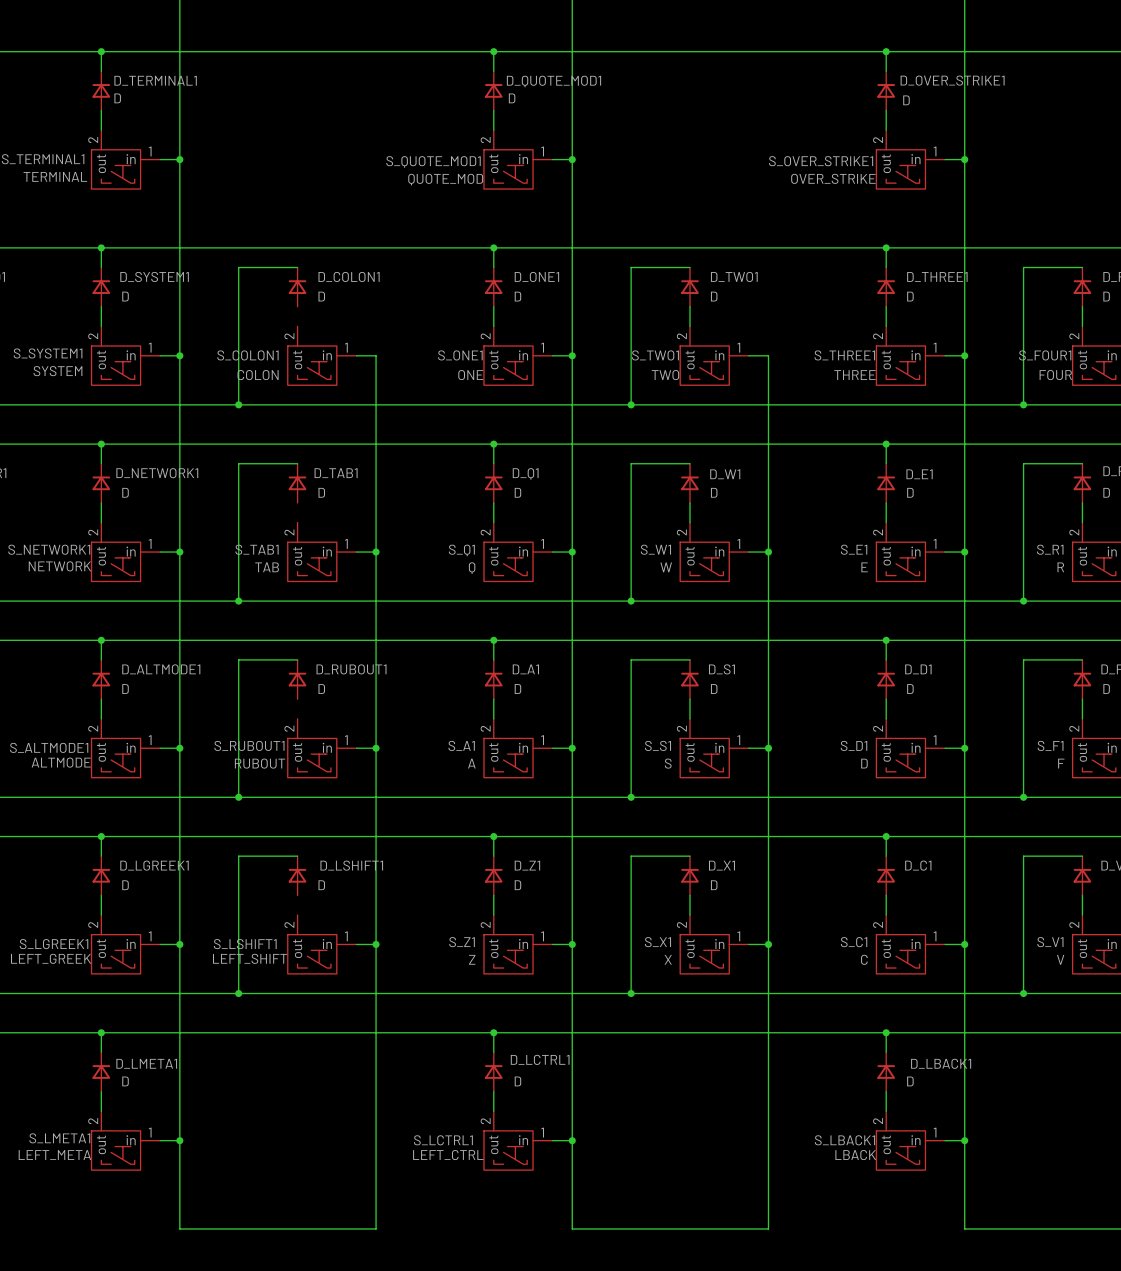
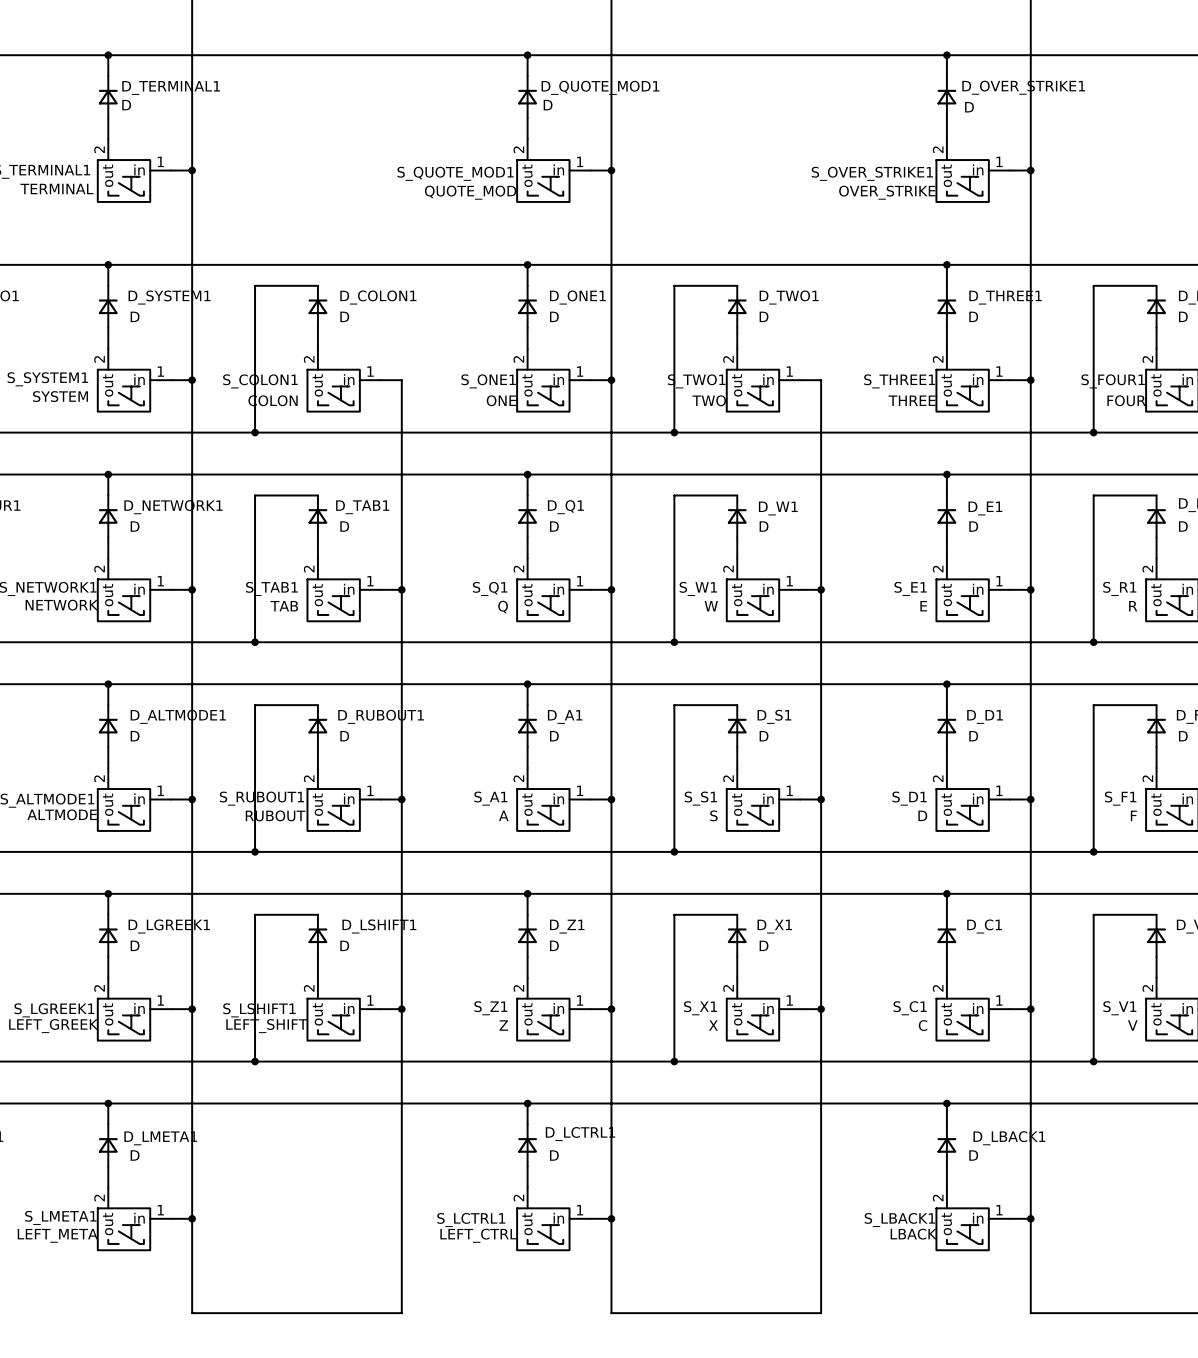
wire: none -> (317, 327) (317, 348)
wire: none -> (317, 537) (317, 558)
wire: none -> (317, 747) (317, 768)
wire: none -> (317, 956) (317, 977)

